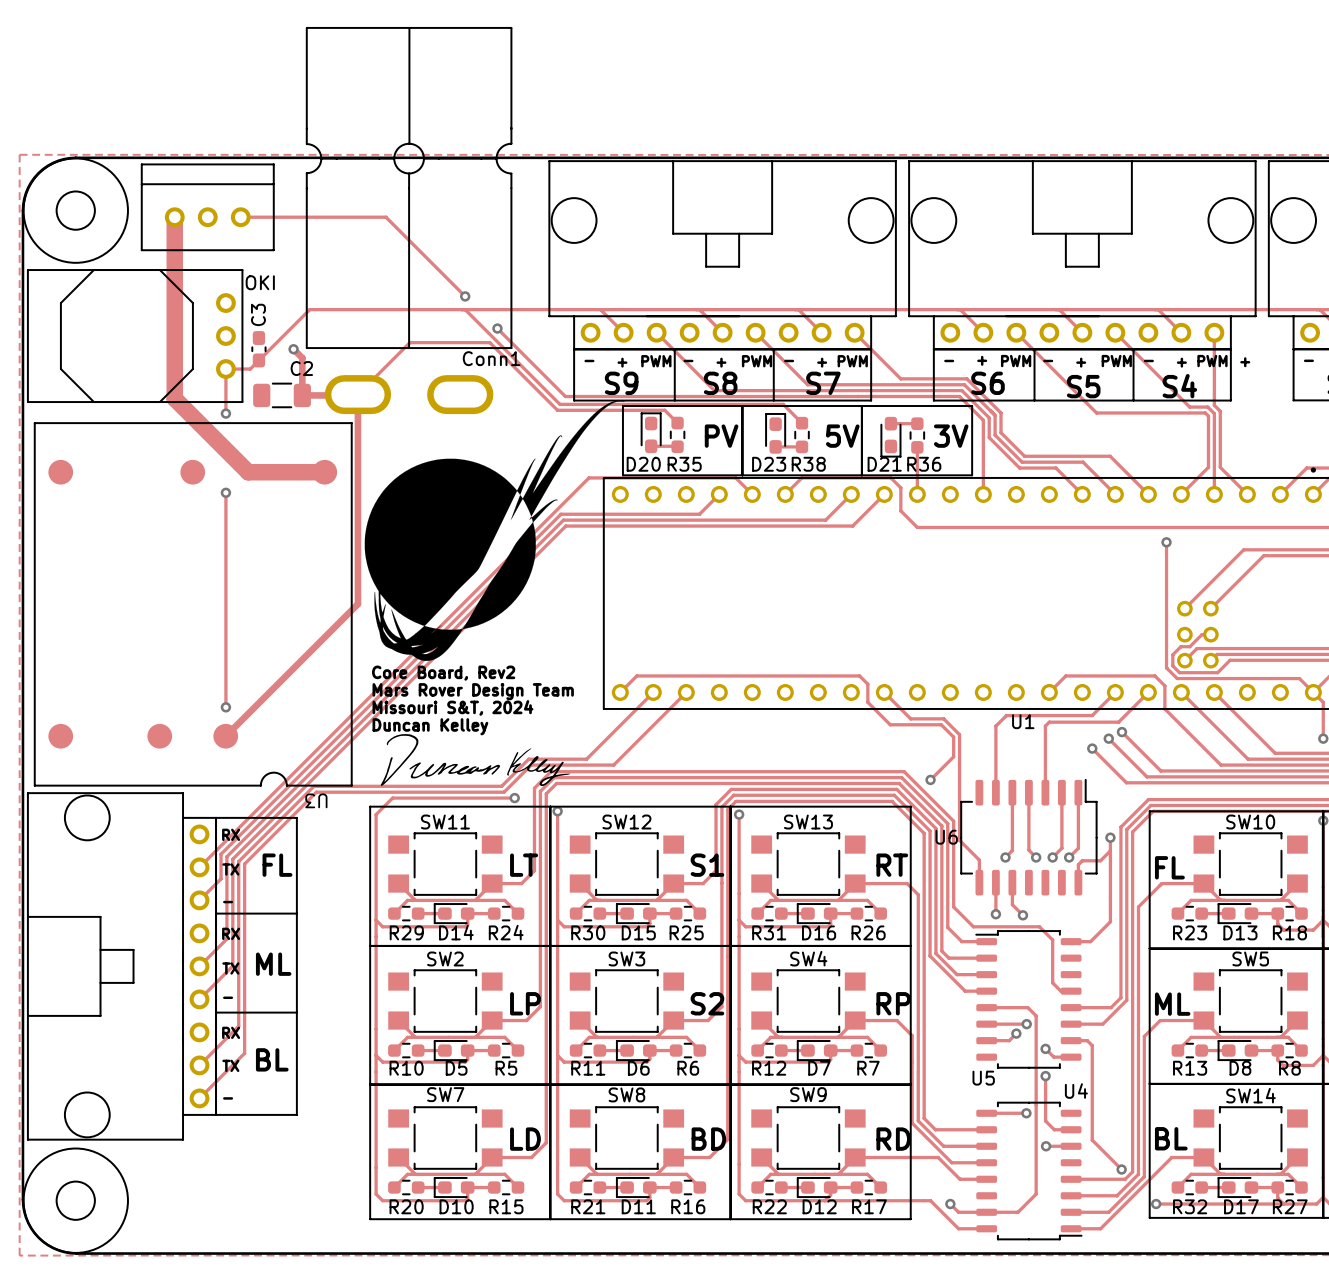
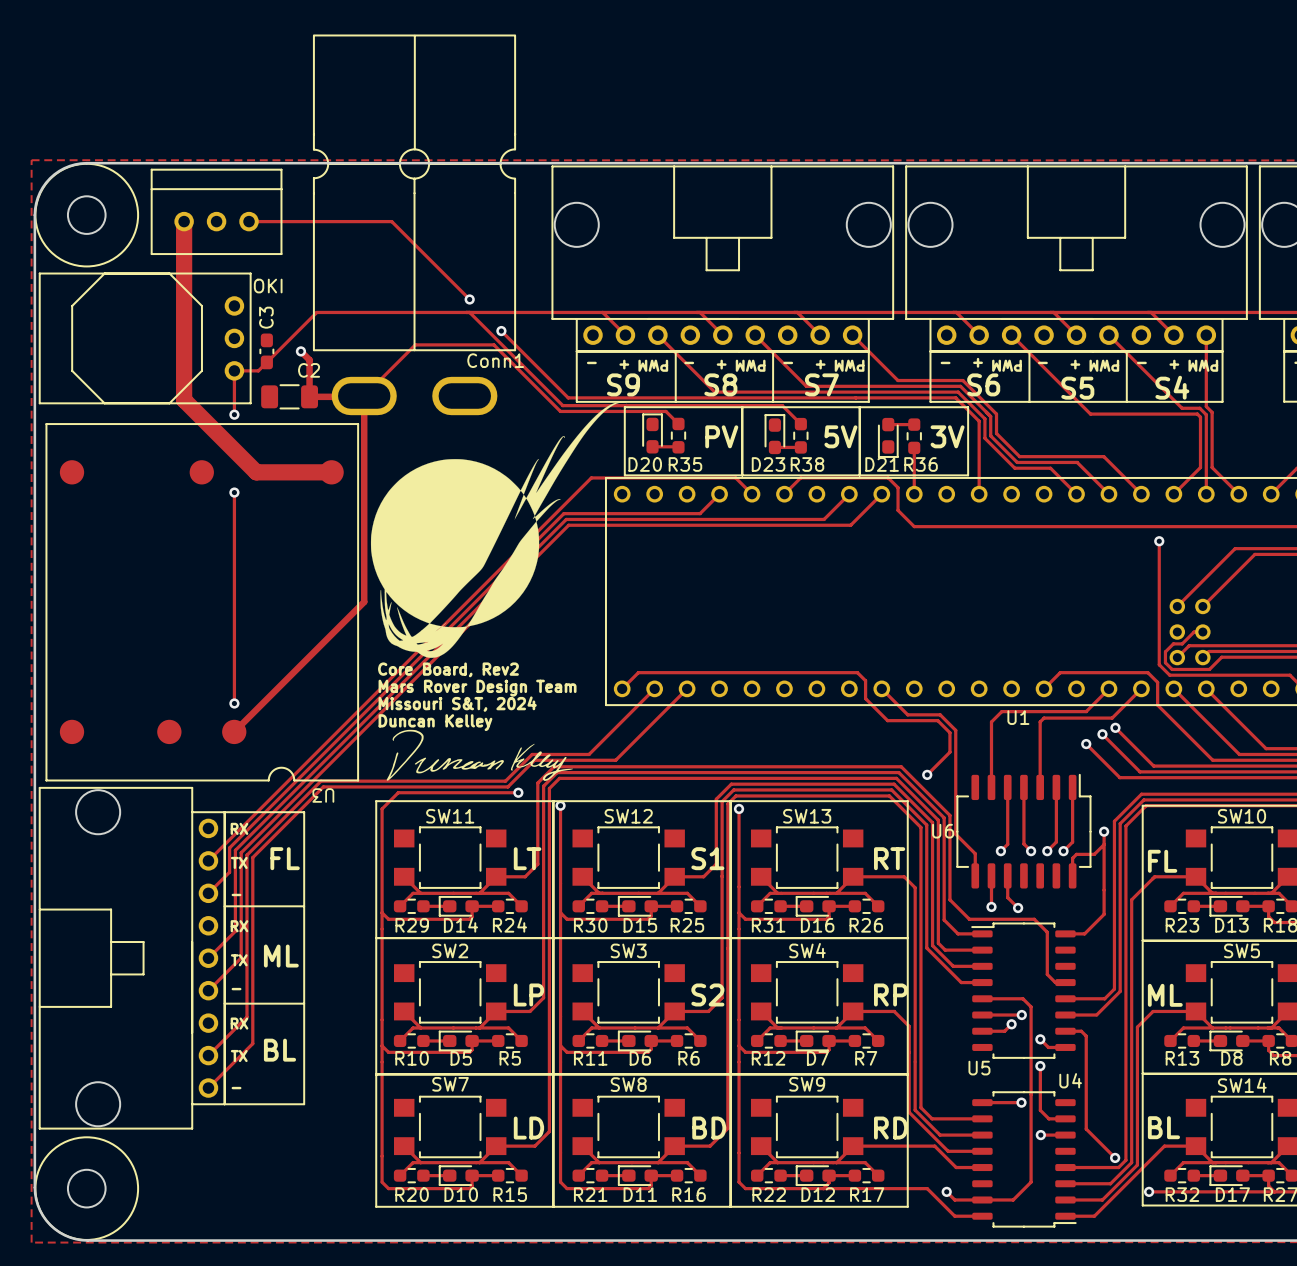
text rotation: 0° (656, 361) -> 180° (653, 365)
text rotation: 0° (757, 361) -> 180° (750, 365)
text rotation: 0° (852, 361) -> 180° (849, 365)
text rotation: 0° (1016, 361) -> 180° (1006, 365)
text rotation: 0° (1116, 361) -> 180° (1104, 365)
text: PWM (1212, 361) -> none
text: + (1245, 362) -> PWM (1203, 365)

